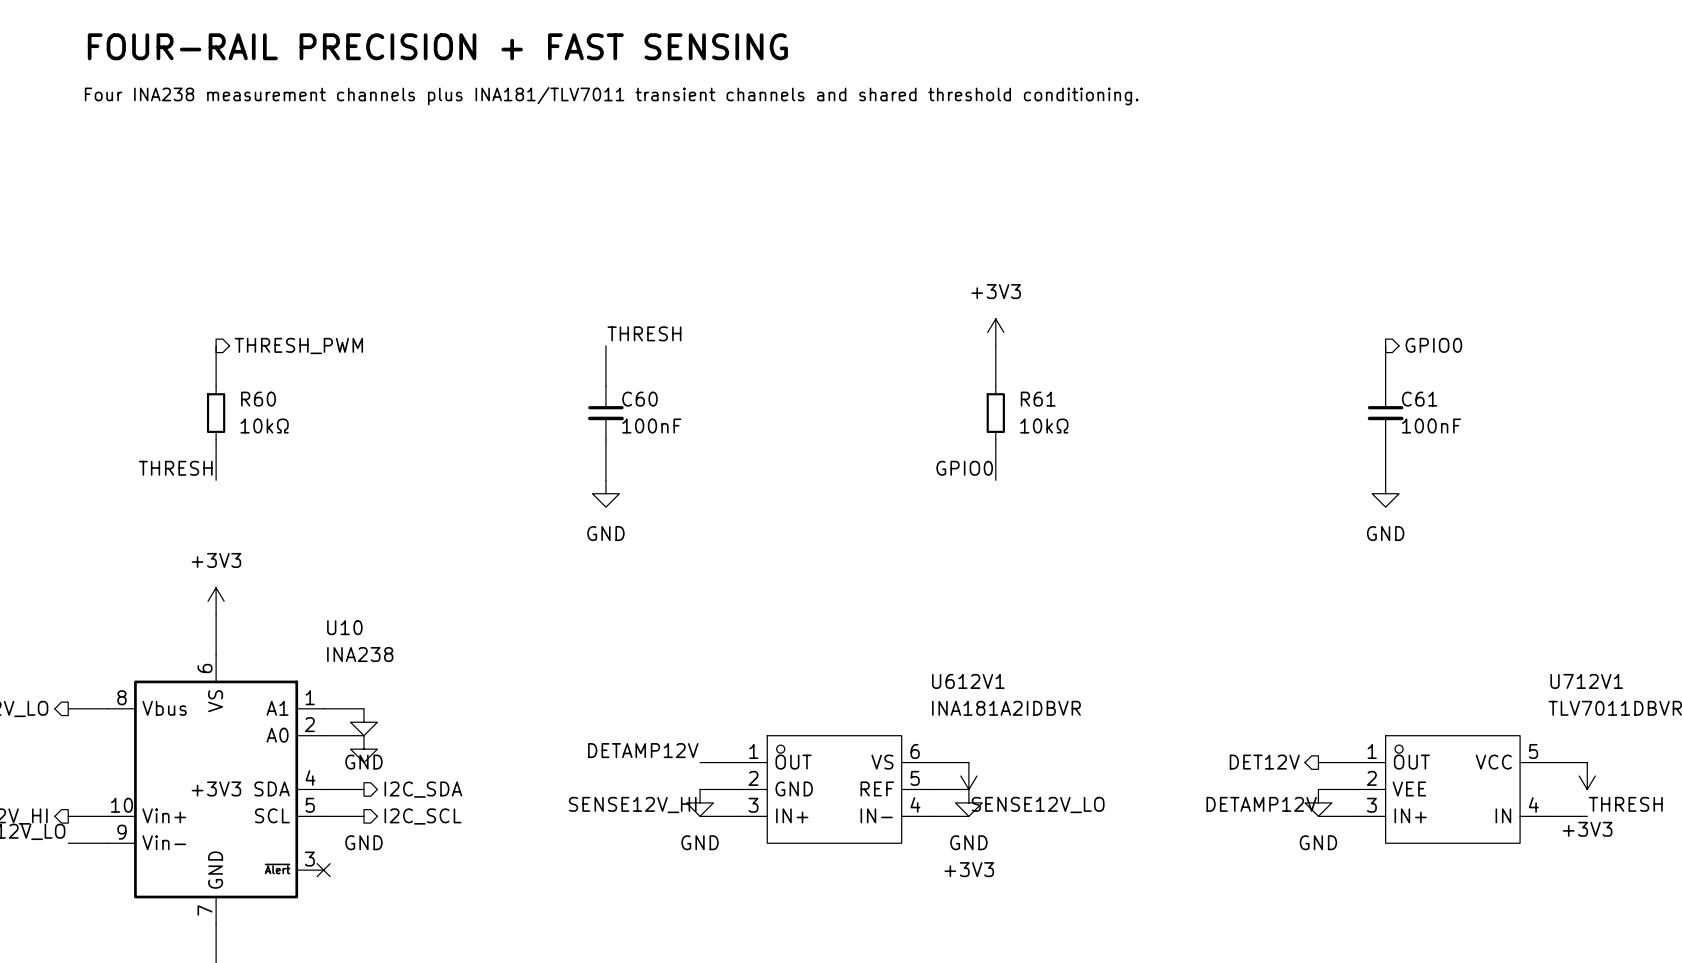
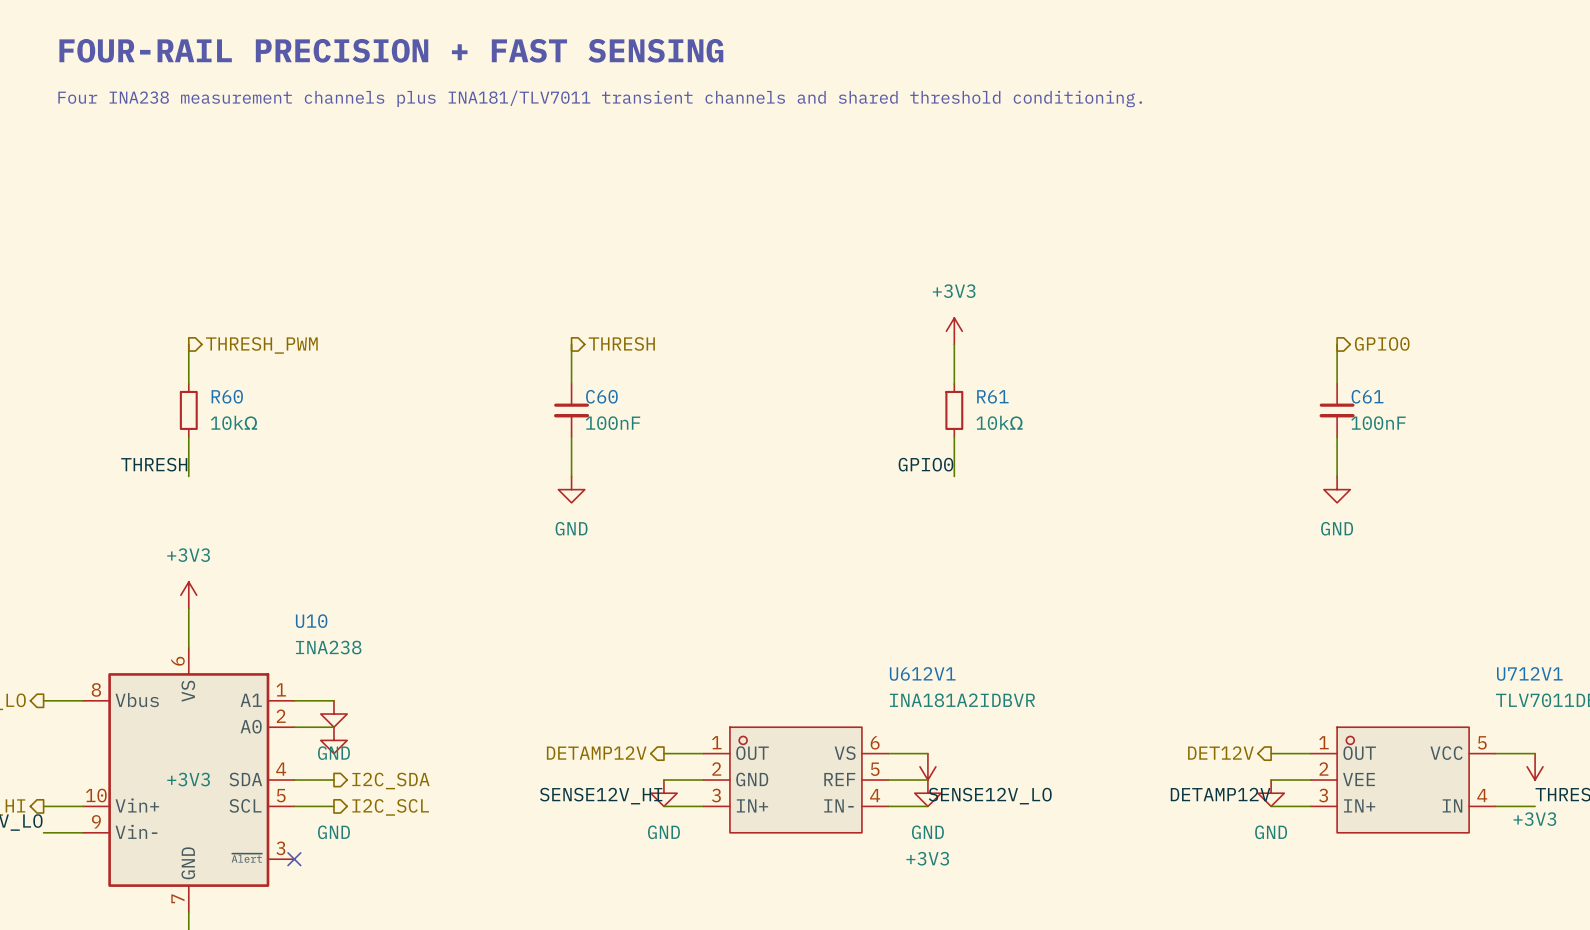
label: THRESH (644, 333) -> none
hierarchical label: none -> THRESH (621, 343)
label: DETAMP12V (643, 750) -> none
hierarchical label: none -> DETAMP12V (596, 753)

